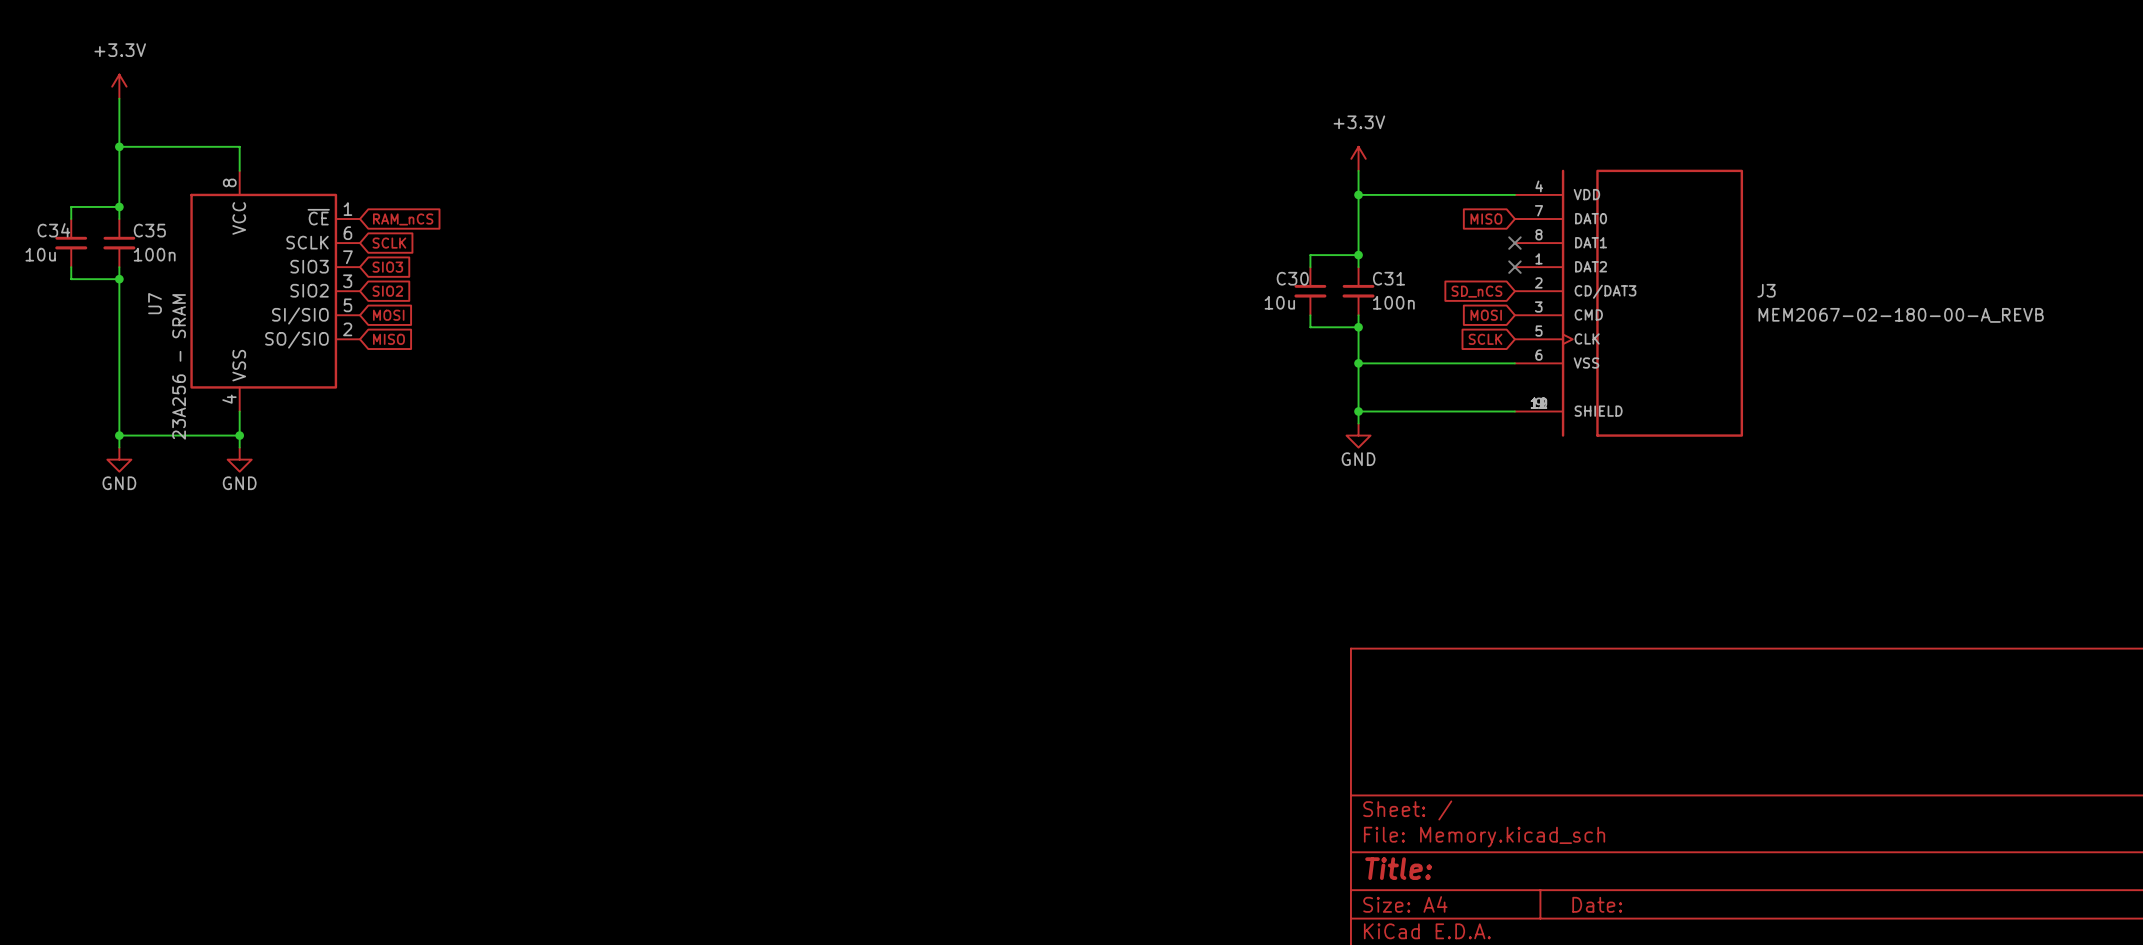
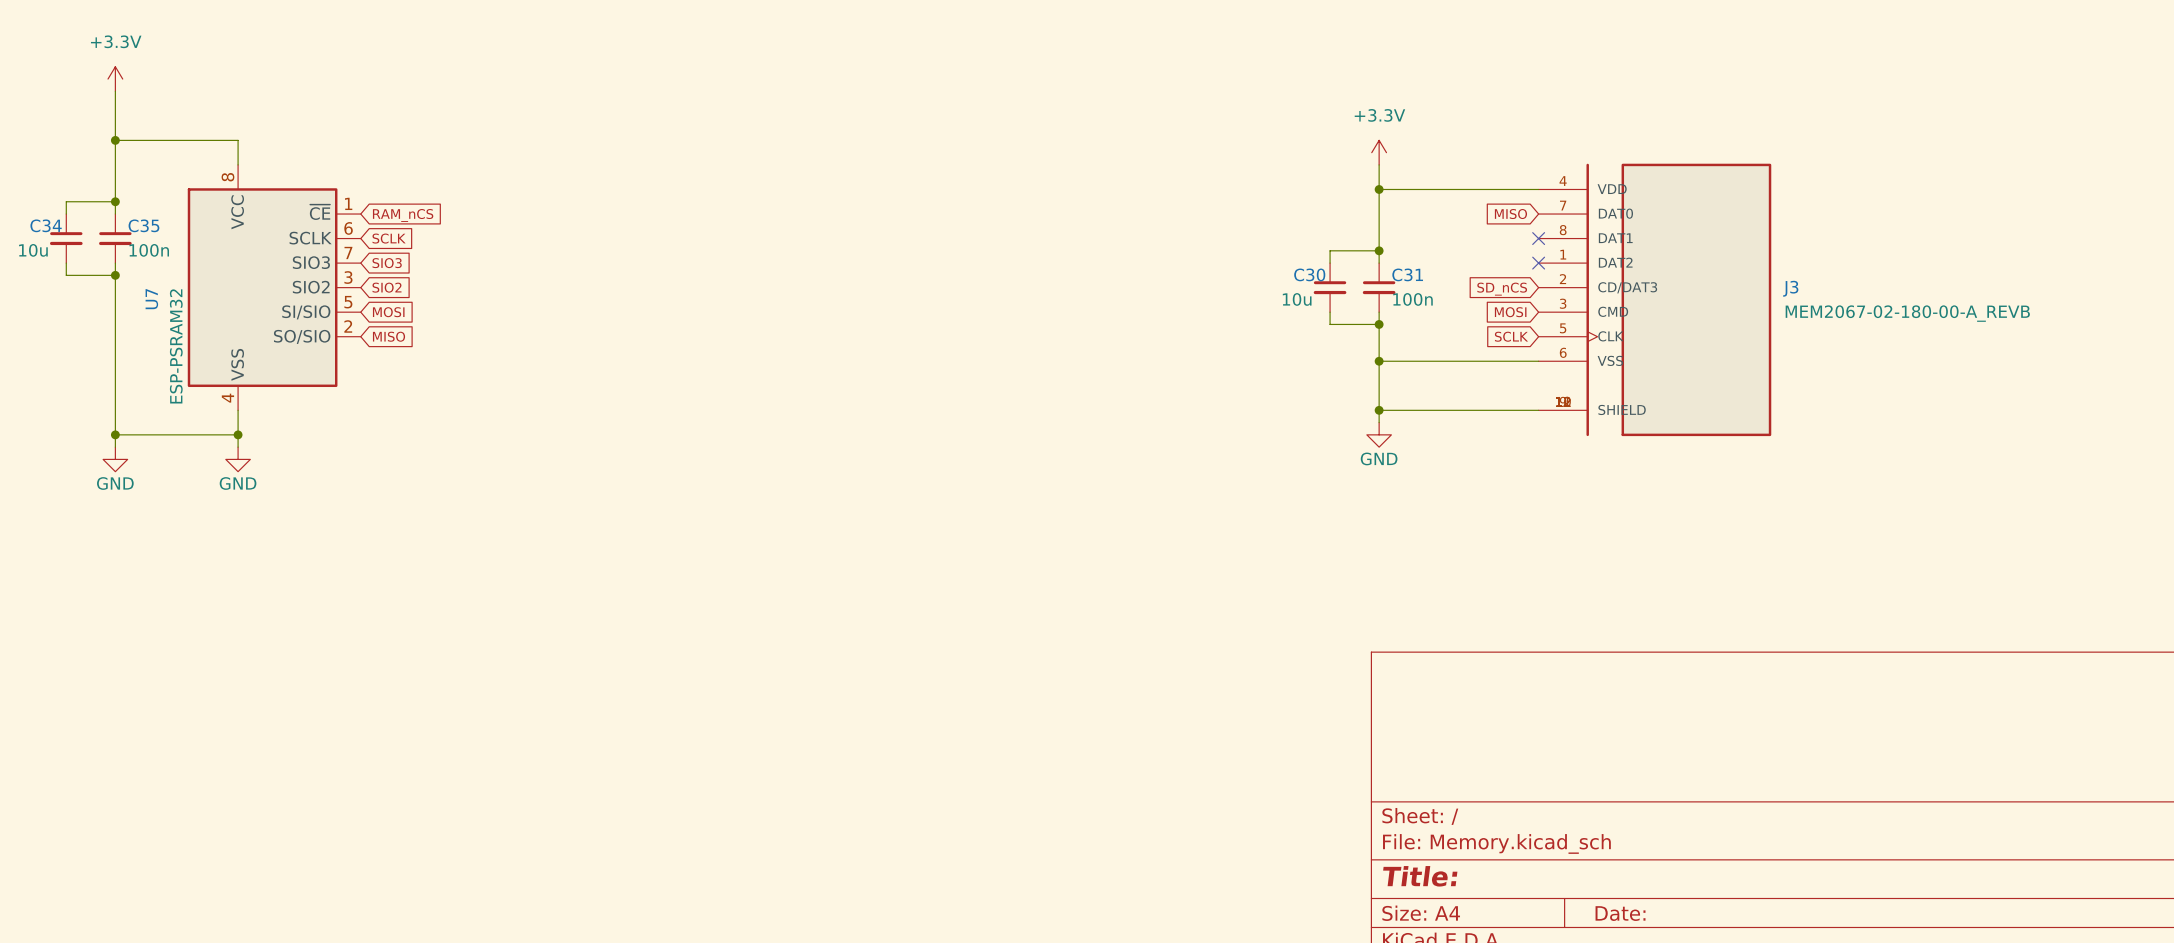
U7 value: 23A256 - SRAM (179, 366) -> ESP-PSRAM32 (176, 346)

